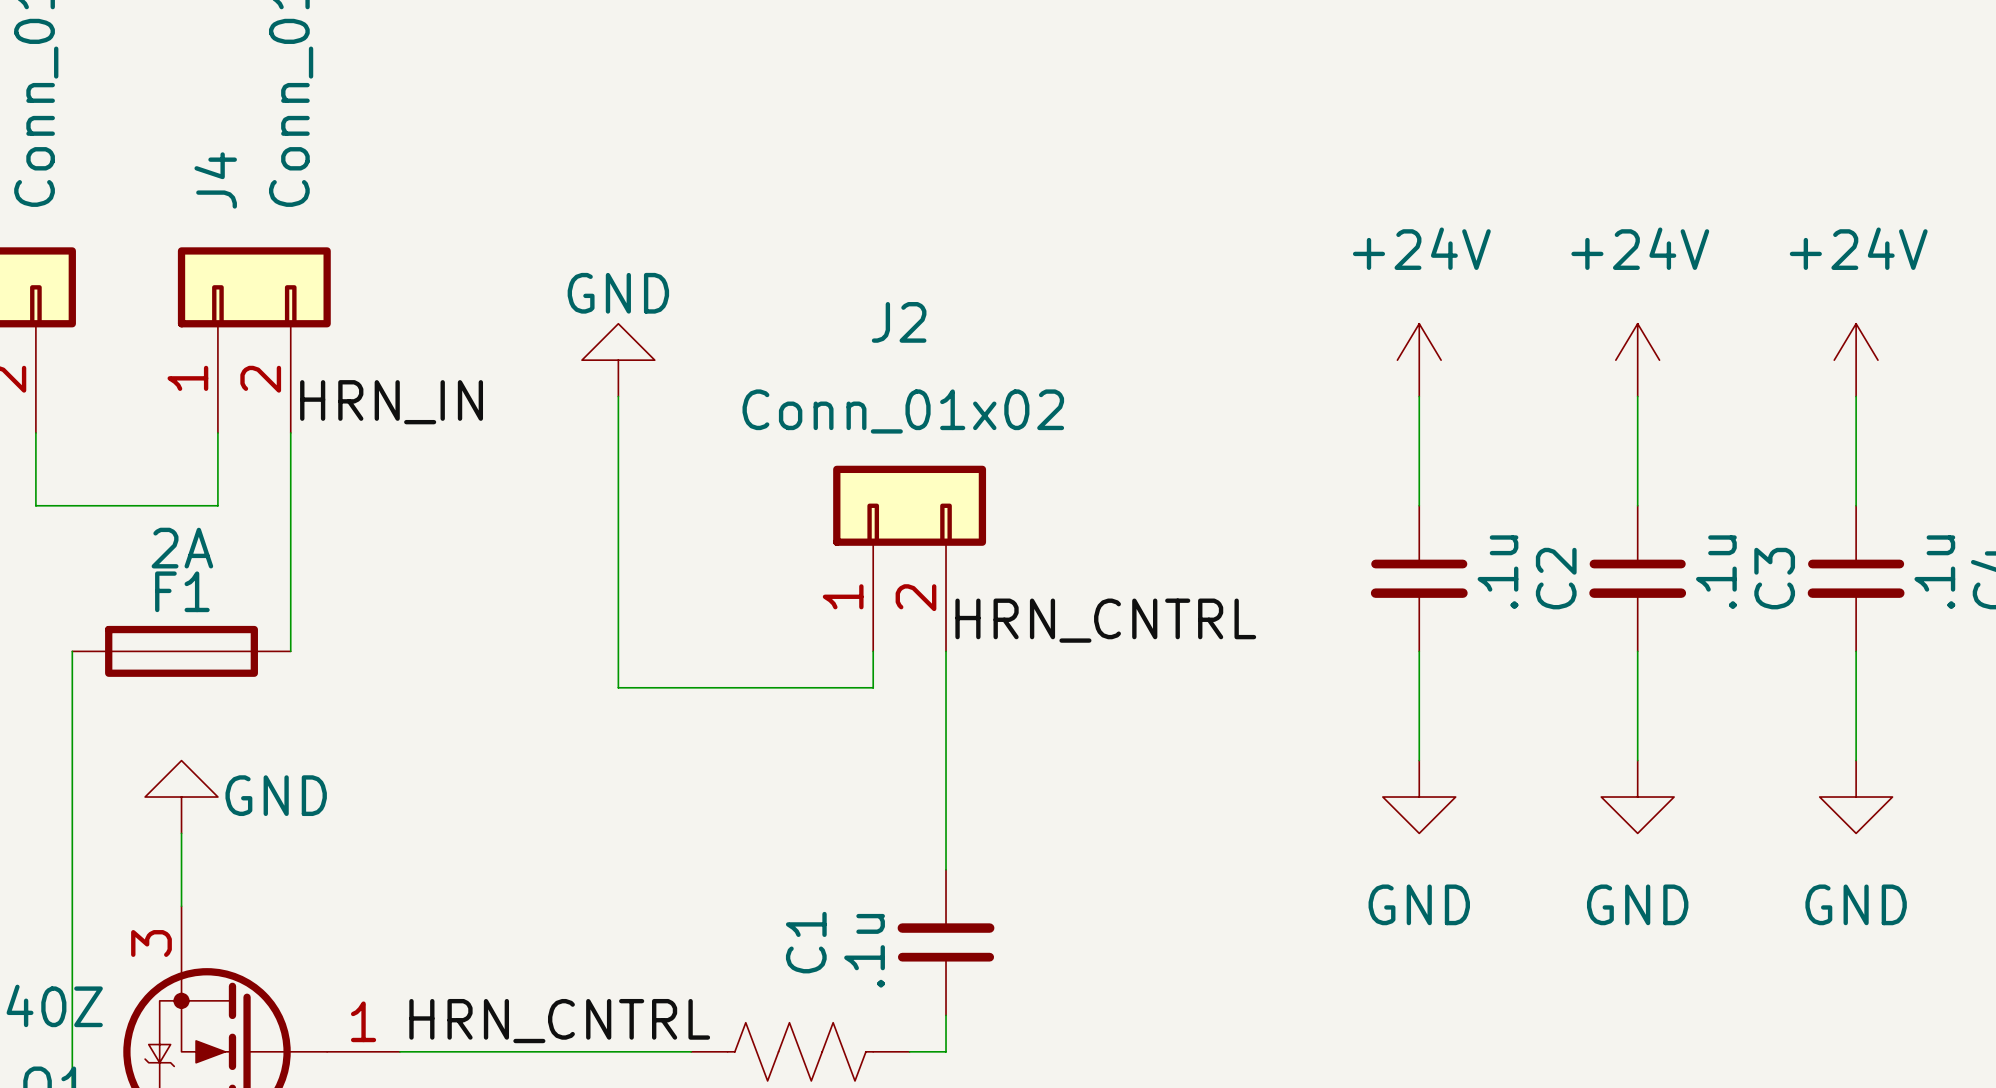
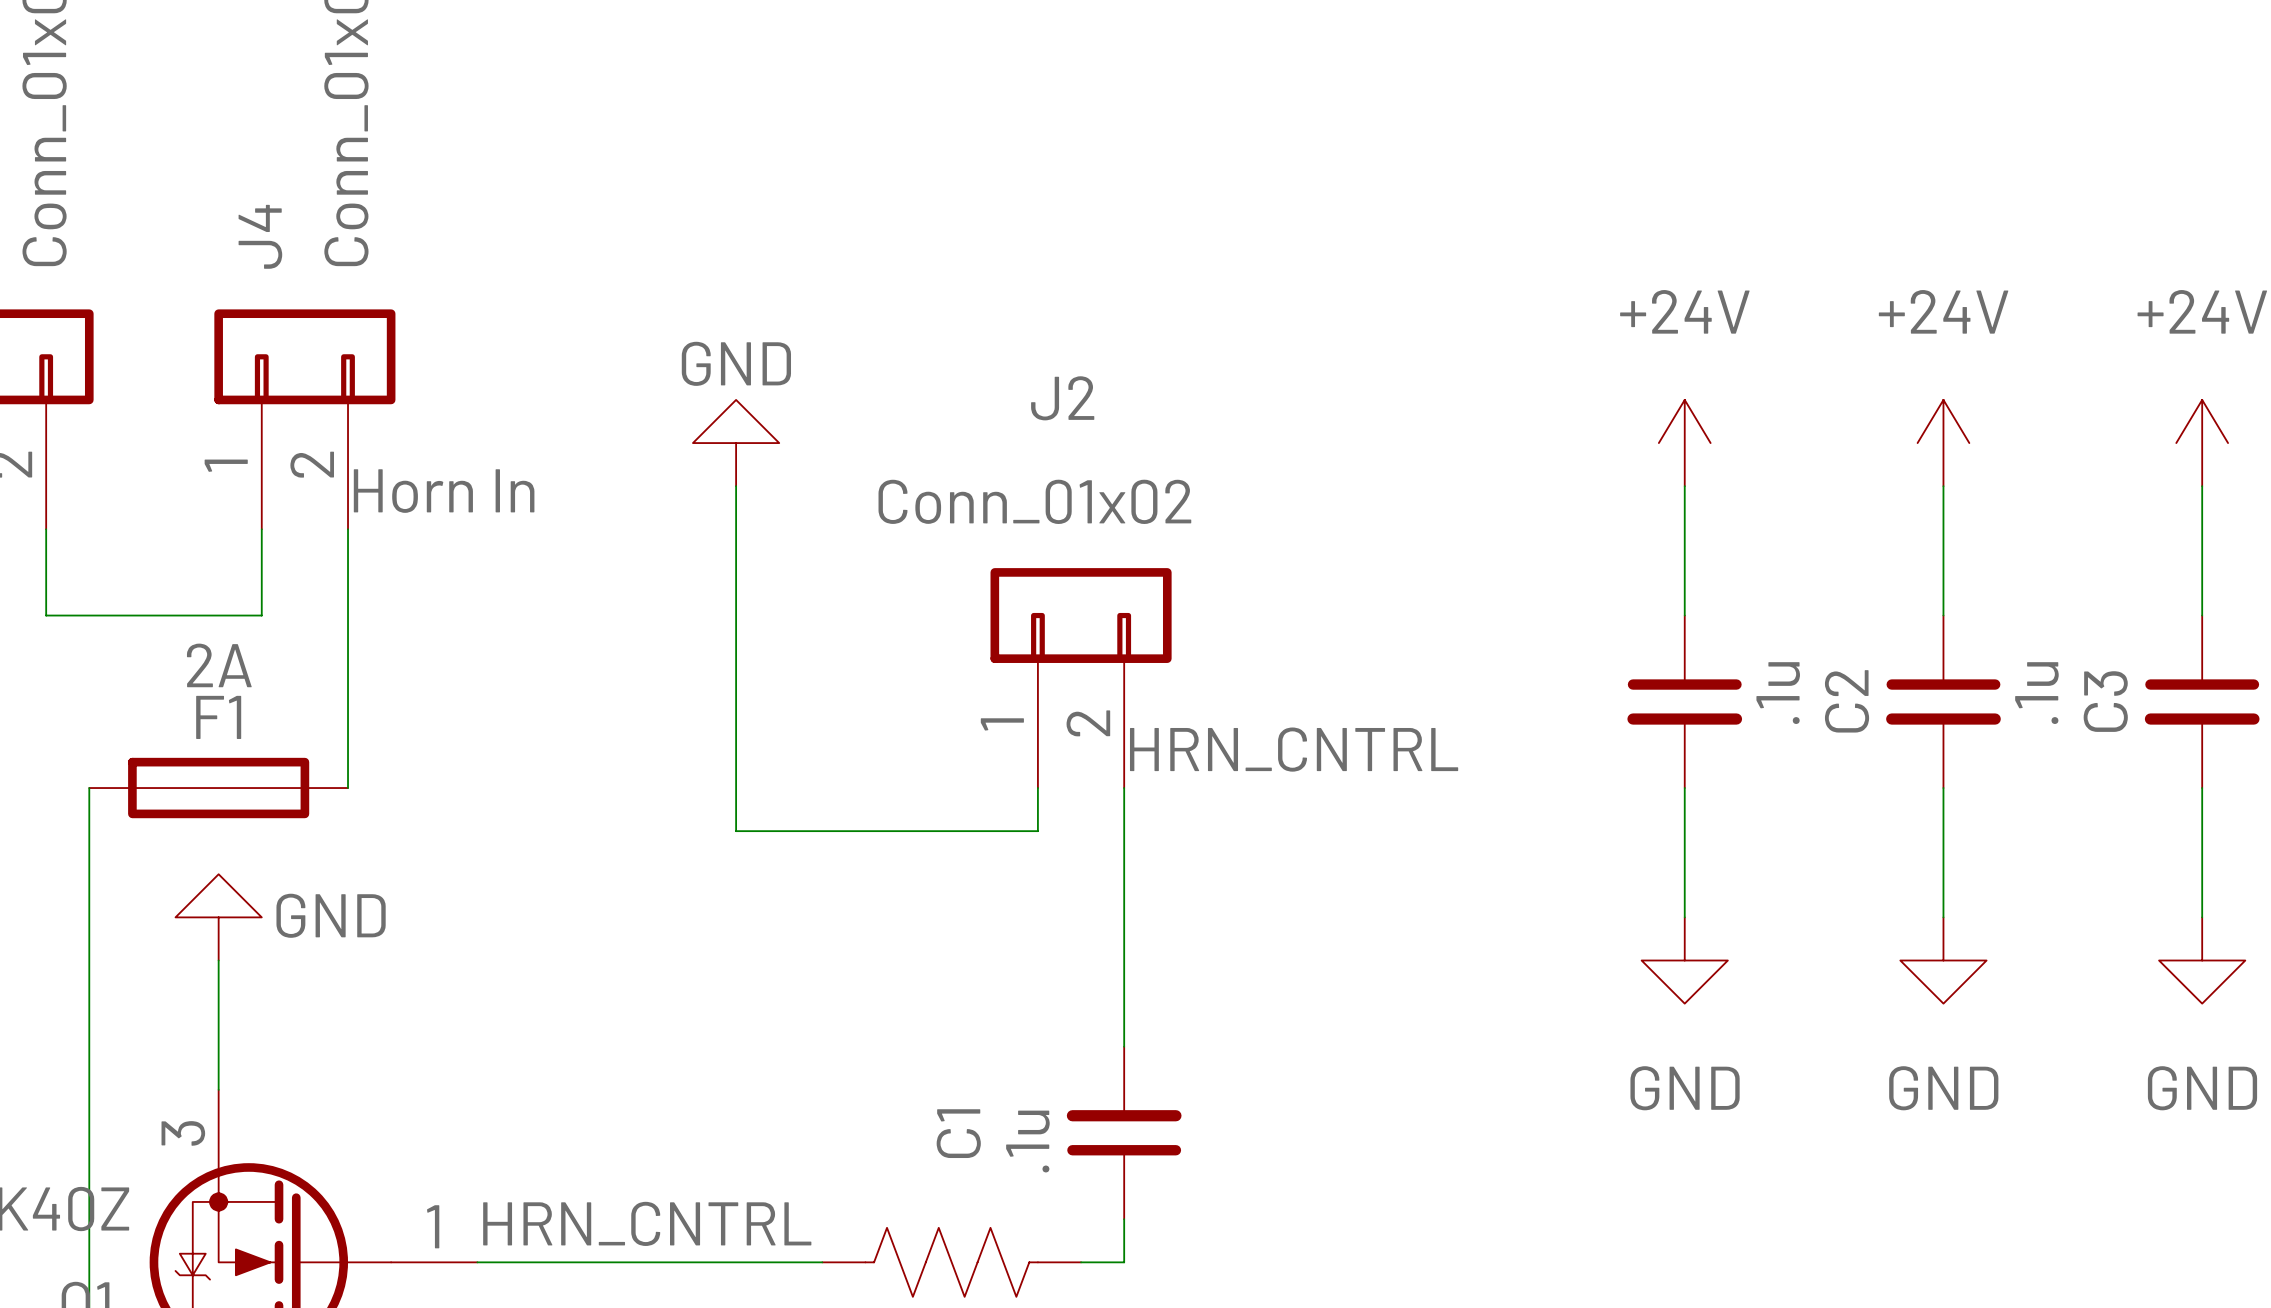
label: HRN_IN (391, 402) -> Horn In (444, 491)
power symbol position: GND (181, 797) -> GND (218, 917)

